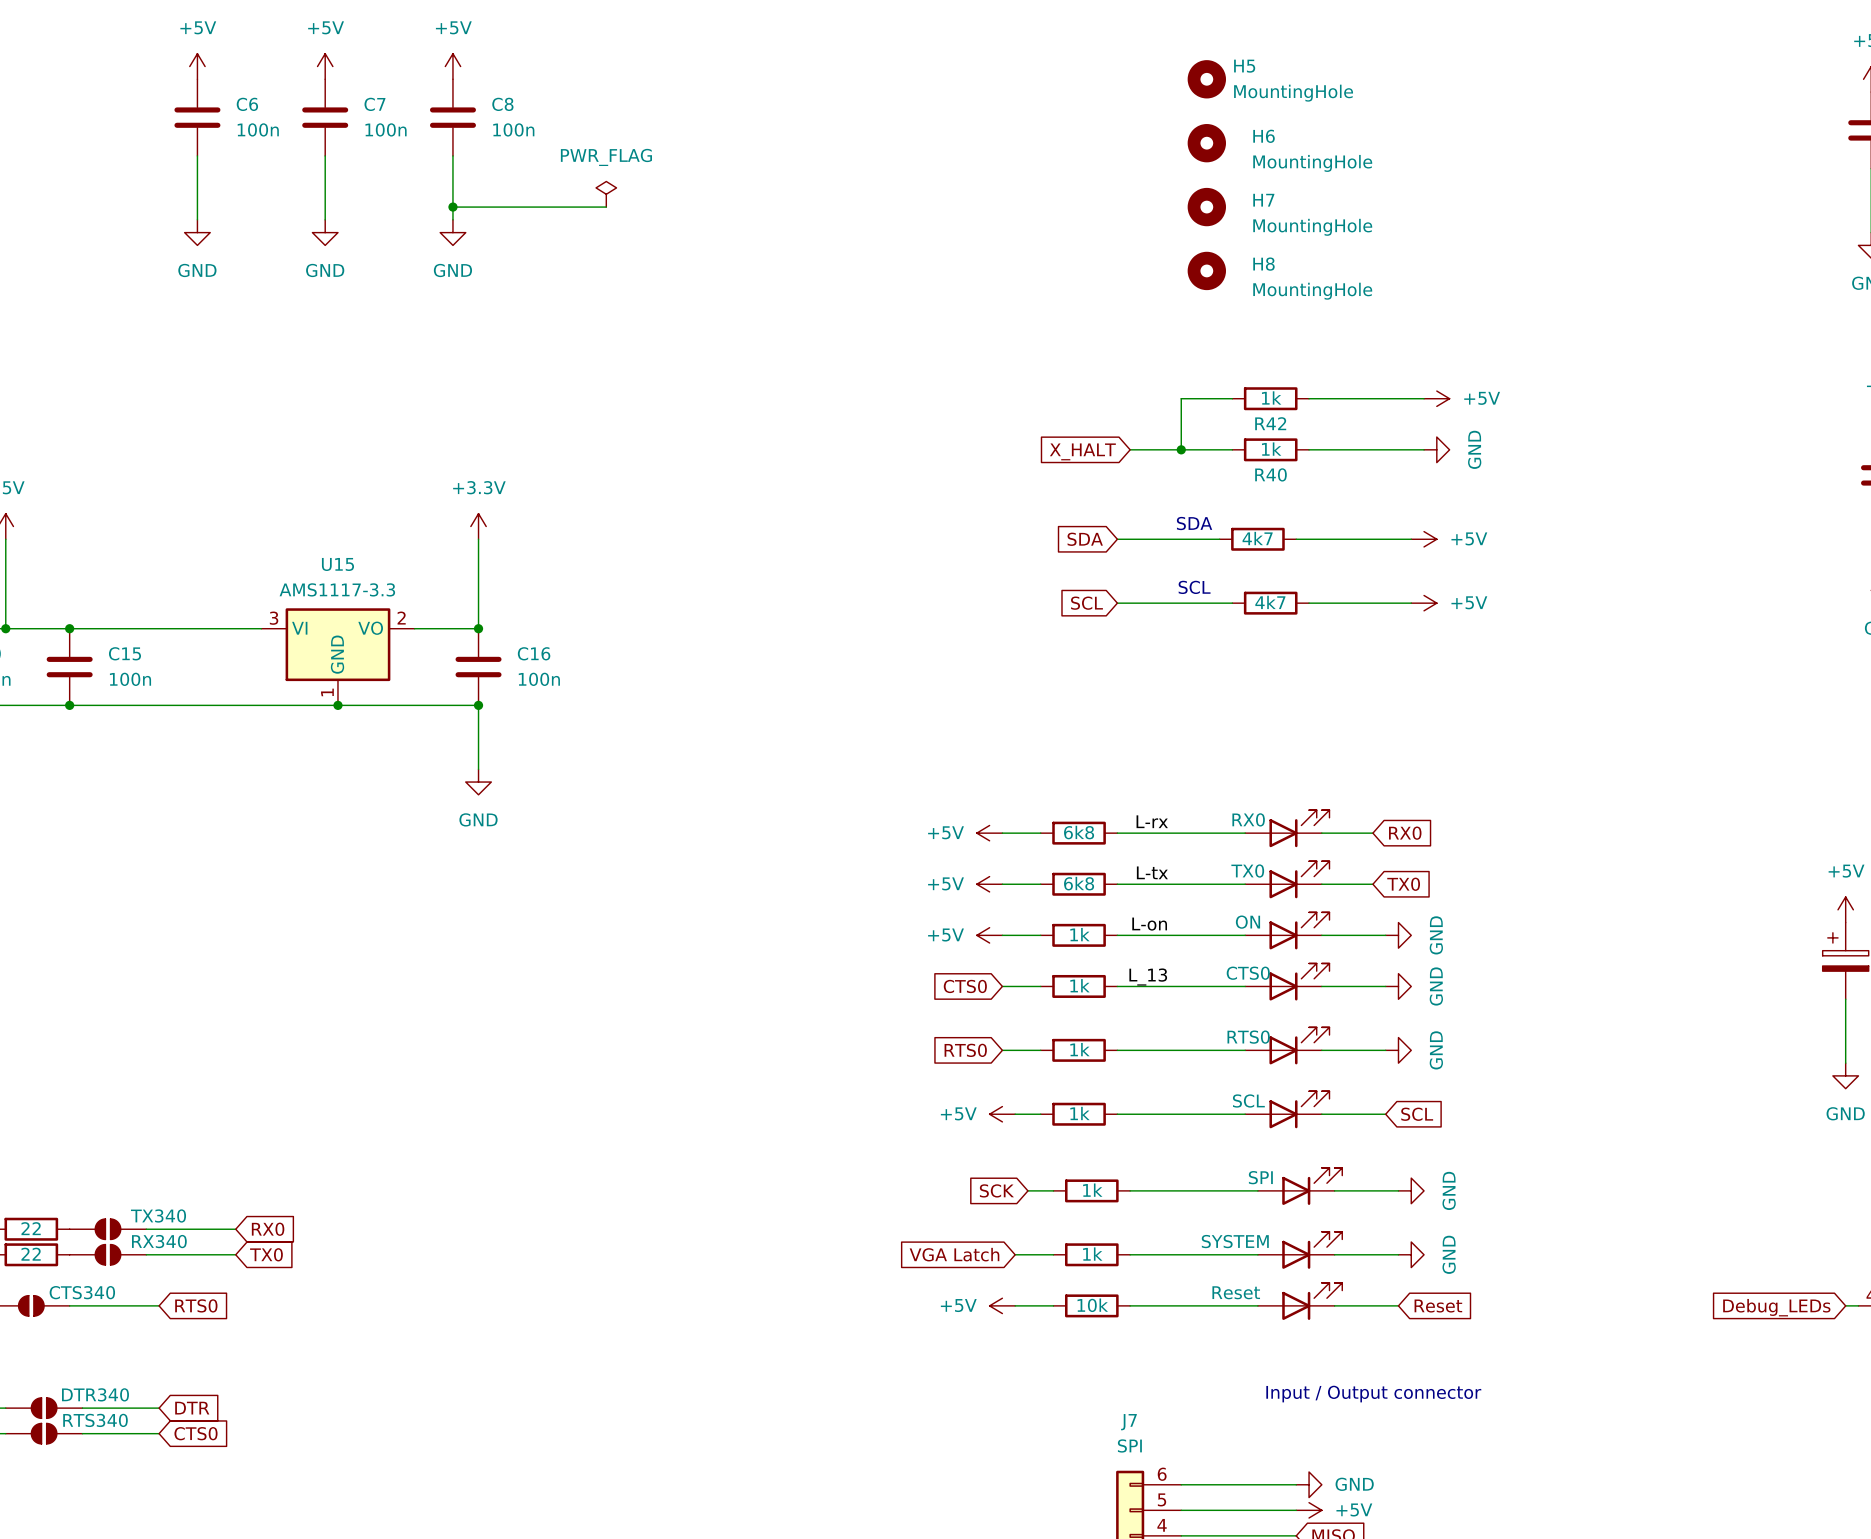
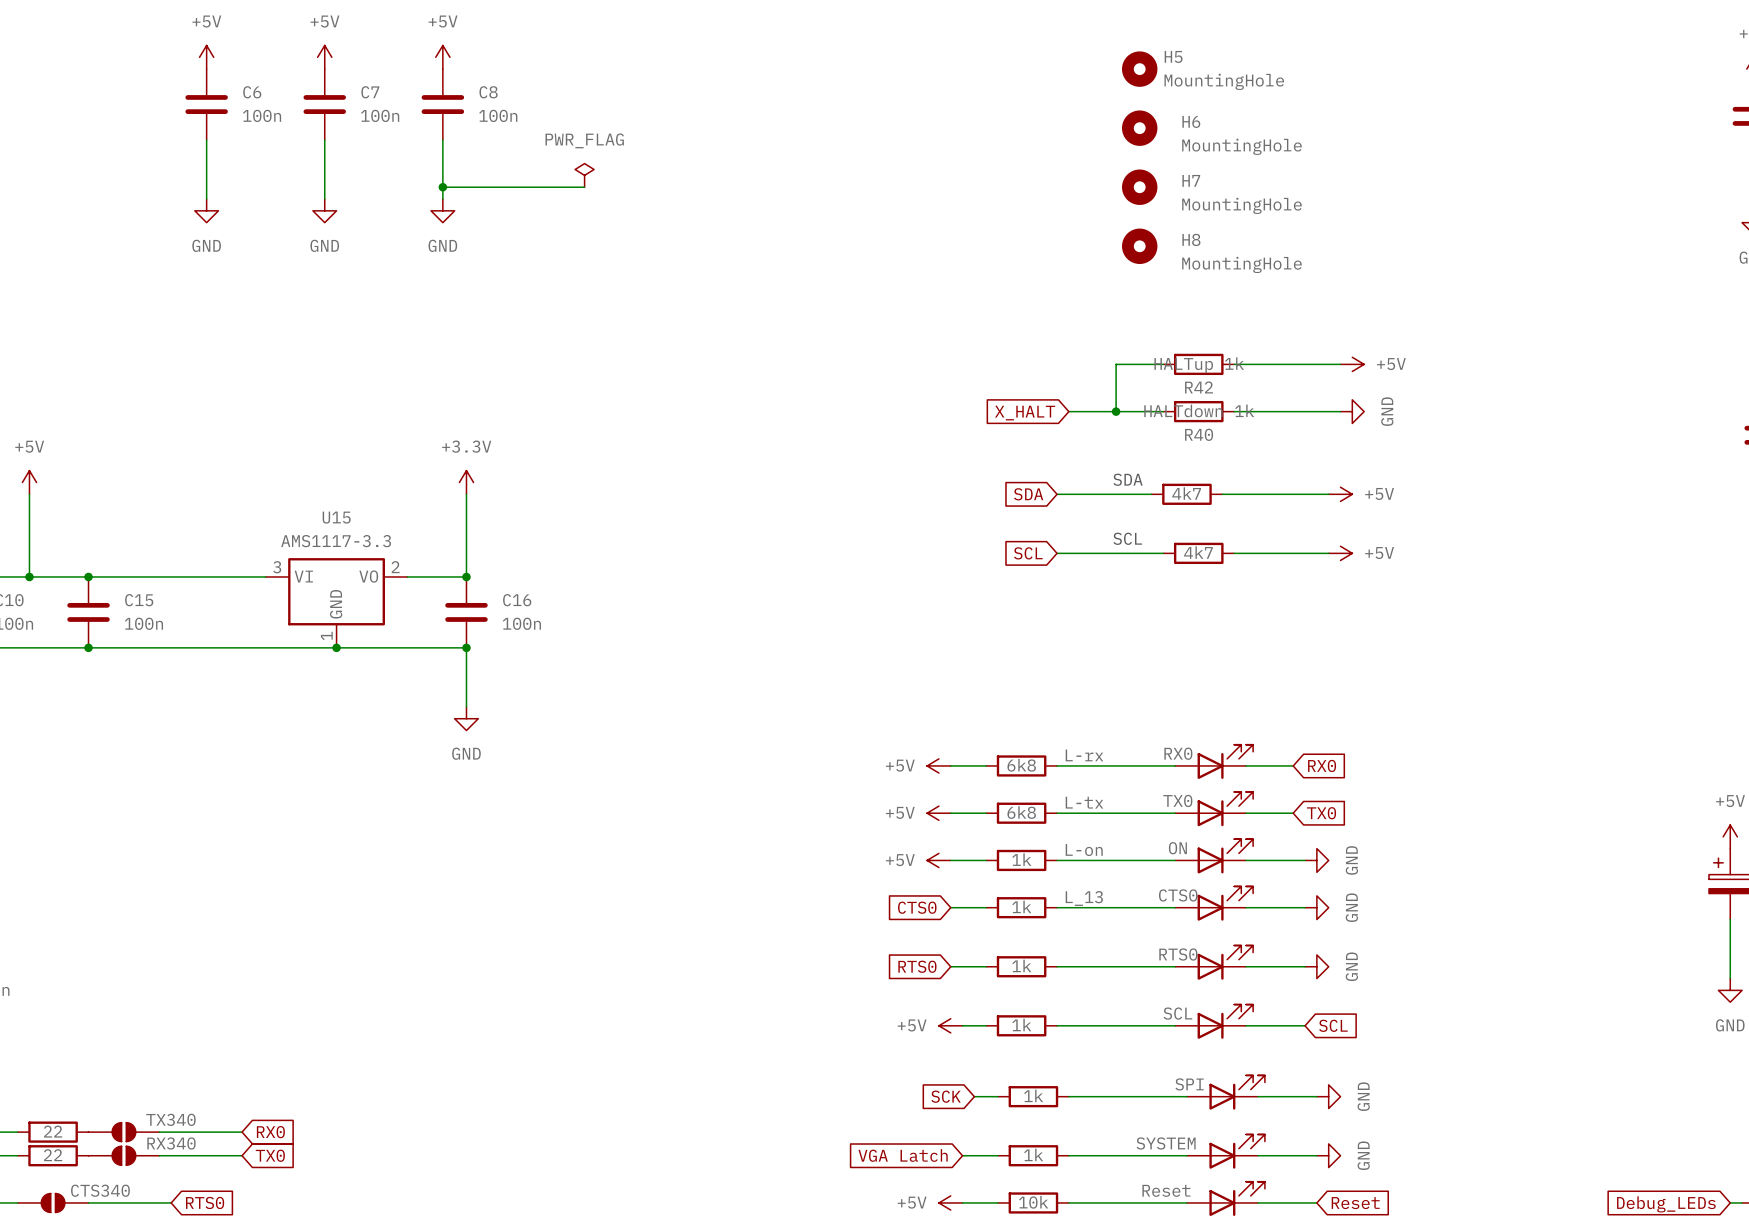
R42 value: 1k (1271, 397) -> HALTup 1k (1199, 365)
R40 value: 1k (1271, 449) -> HALTdown 1k (1199, 410)

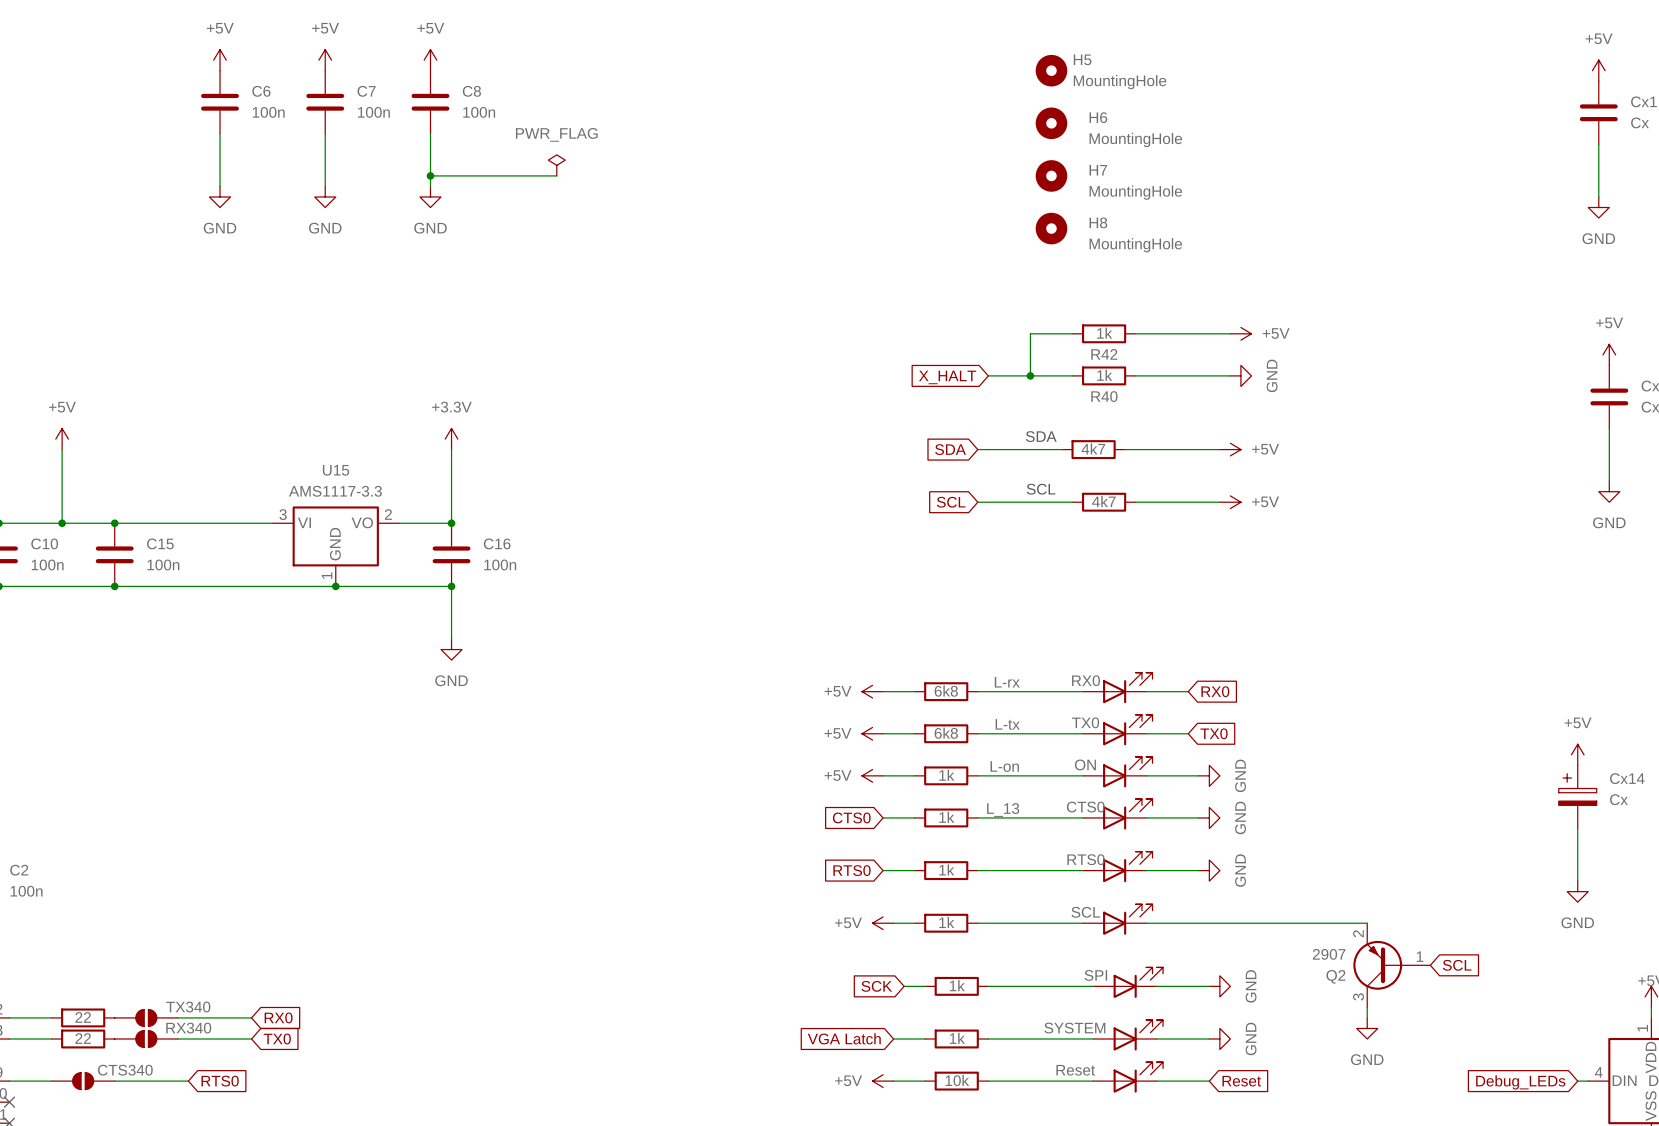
R42 value: HALTup 1k (1199, 365) -> 1k (1104, 333)
R40 value: HALTdown 1k (1199, 410) -> 1k (1104, 375)
wire: none -> (1198, 923) (1367, 923)
global label: SCL (1333, 1025) -> none
Q2: none -> 2907 (1391, 965)
global label: none -> SCL (1457, 965)
wire: none -> (1367, 1007) (1367, 1017)
power symbol: none -> GND (1367, 1028)

